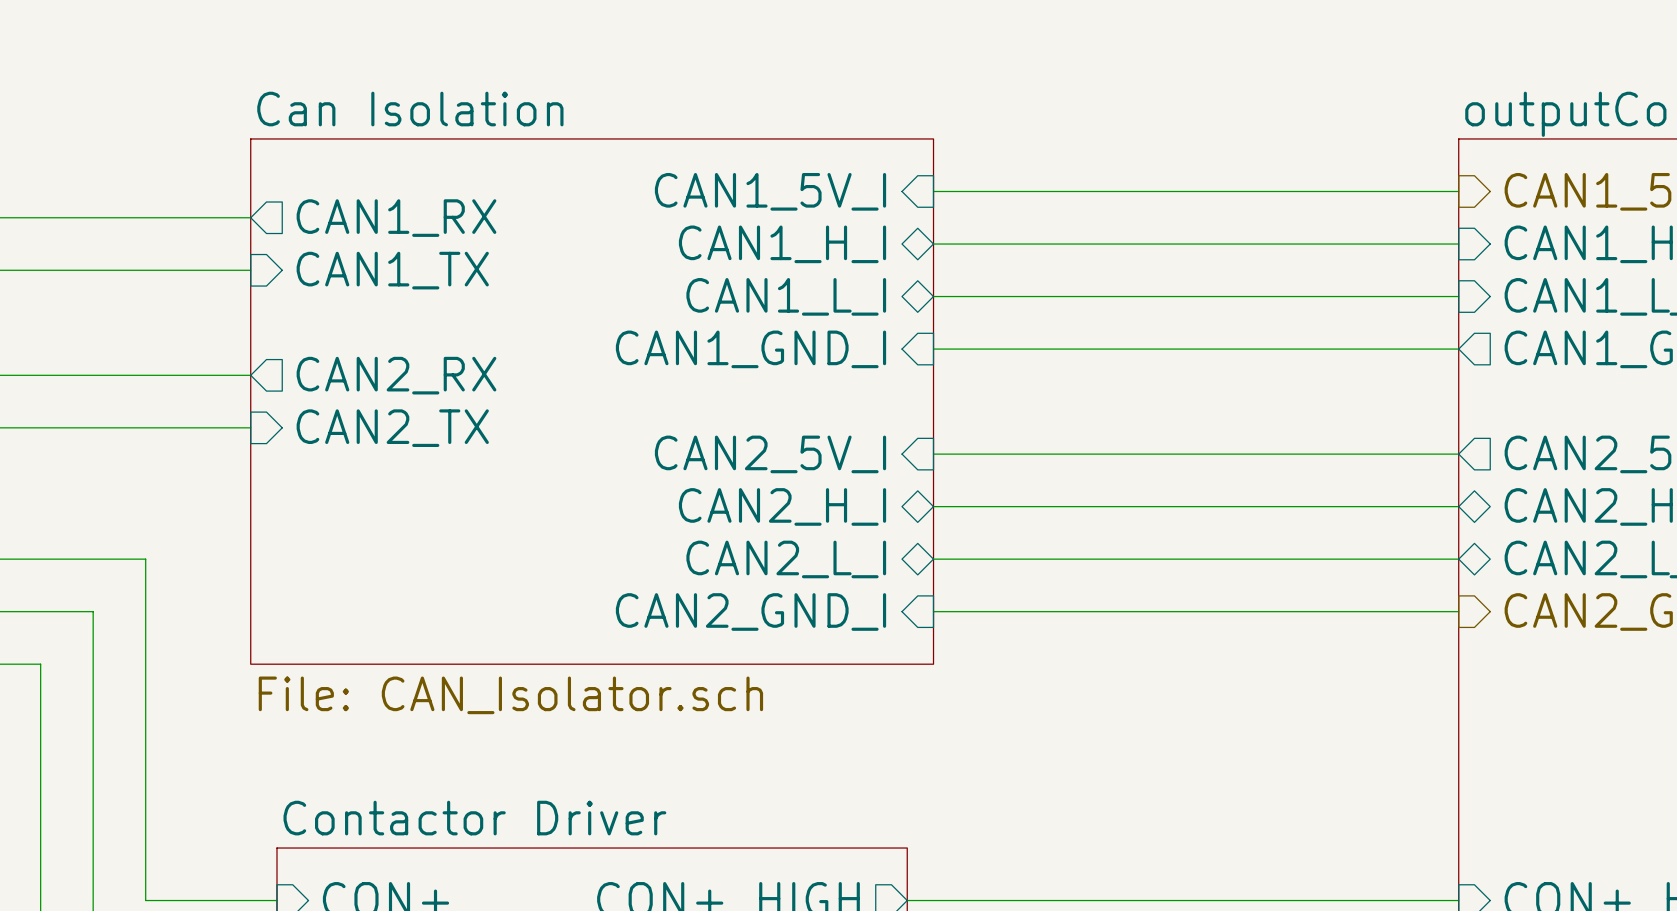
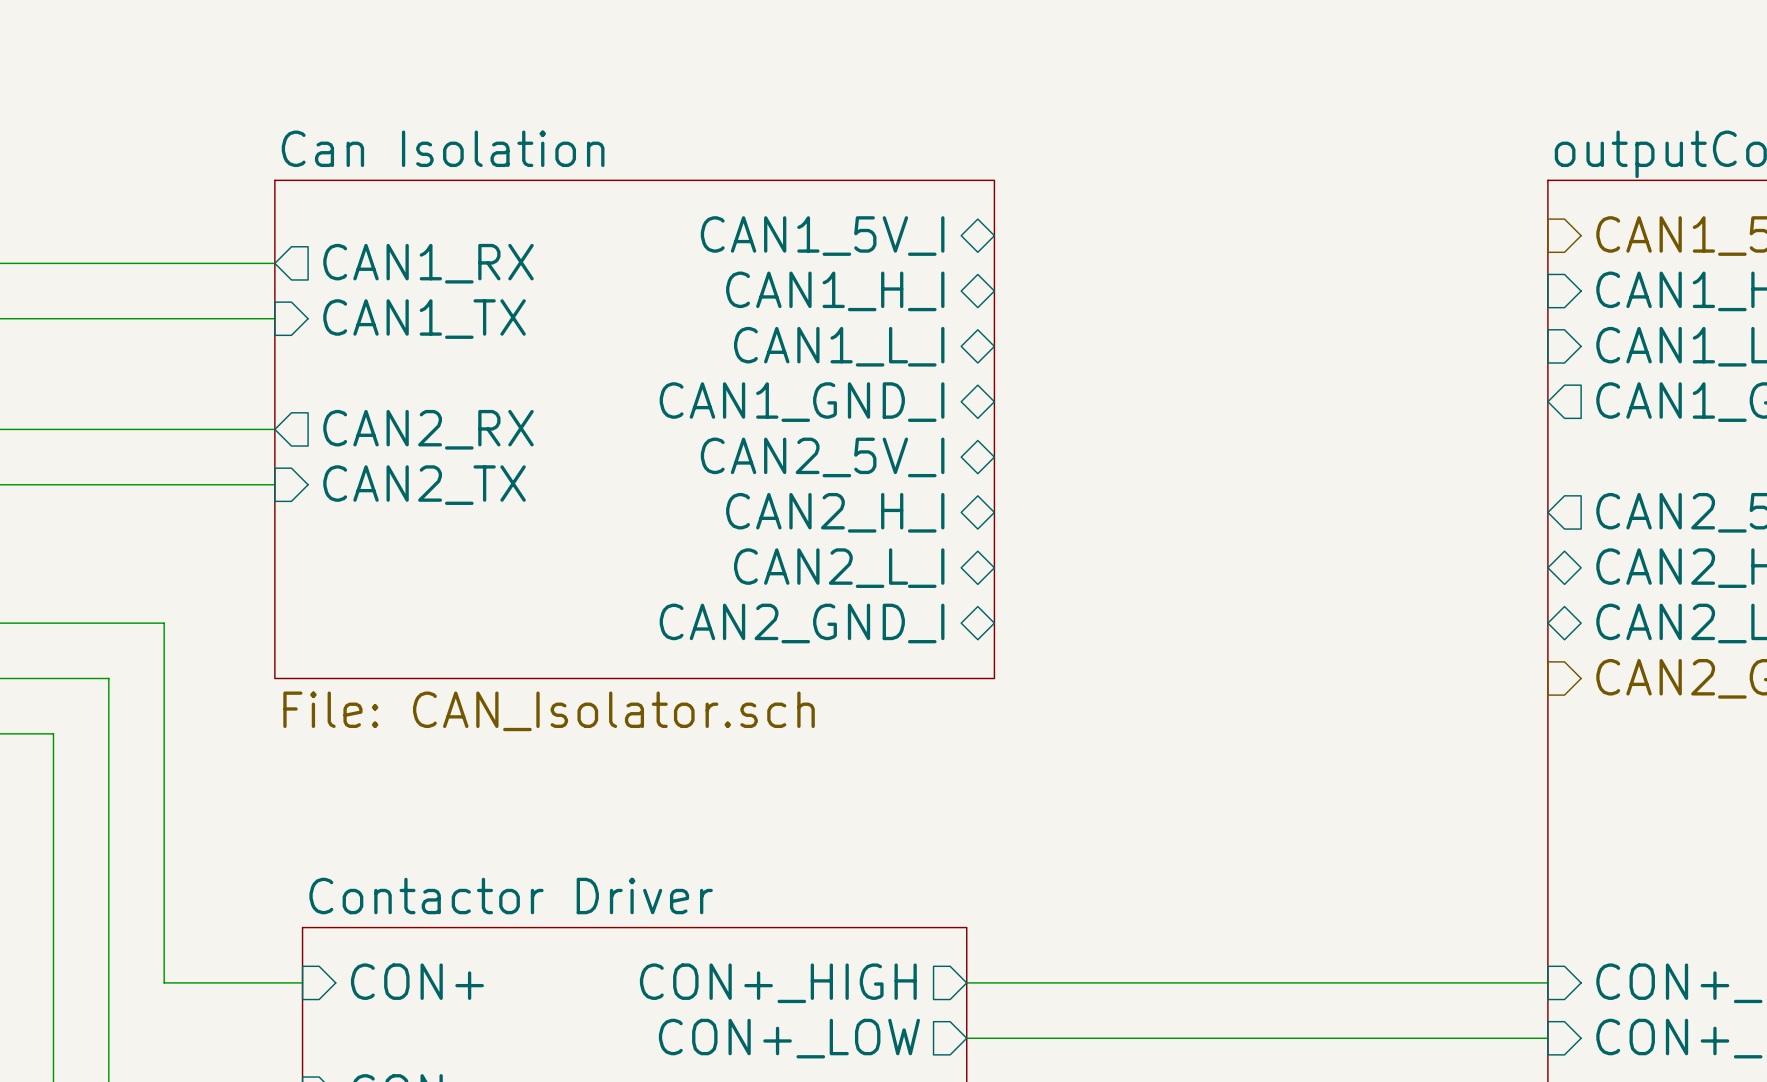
sheet pin shape: input (770, 191) -> bidirectional (822, 236)
wire: (933, 191) (1458, 191) -> none
wire: (933, 244) (1458, 244) -> none
wire: (933, 296) (1458, 296) -> none
sheet pin shape: input (750, 349) -> bidirectional (802, 402)
wire: (933, 349) (1458, 349) -> none
sheet Can Isolation: none -> File: CAN_Isolator.sch (634, 429)
sheet Can Isolation: File: CAN_Isolator.sch (592, 401) -> none
sheet pin: none -> CAN2_5V_I (822, 457)
sheet pin shape: input (770, 454) -> bidirectional (835, 512)
sheet pin: CAN2_5V_I (770, 454) -> CAN2_H_I (835, 512)
wire: (933, 454) (1458, 454) -> none
sheet pin: CAN2_H_I (782, 506) -> CAN2_L_I (839, 568)
wire: (933, 506) (1458, 506) -> none
sheet pin: CAN2_L_I (786, 559) -> CAN2_GND_I (802, 623)
wire: (933, 559) (1458, 559) -> none
sheet pin: CAN2_GND_I (750, 611) -> none
wire: (933, 611) (1458, 611) -> none

